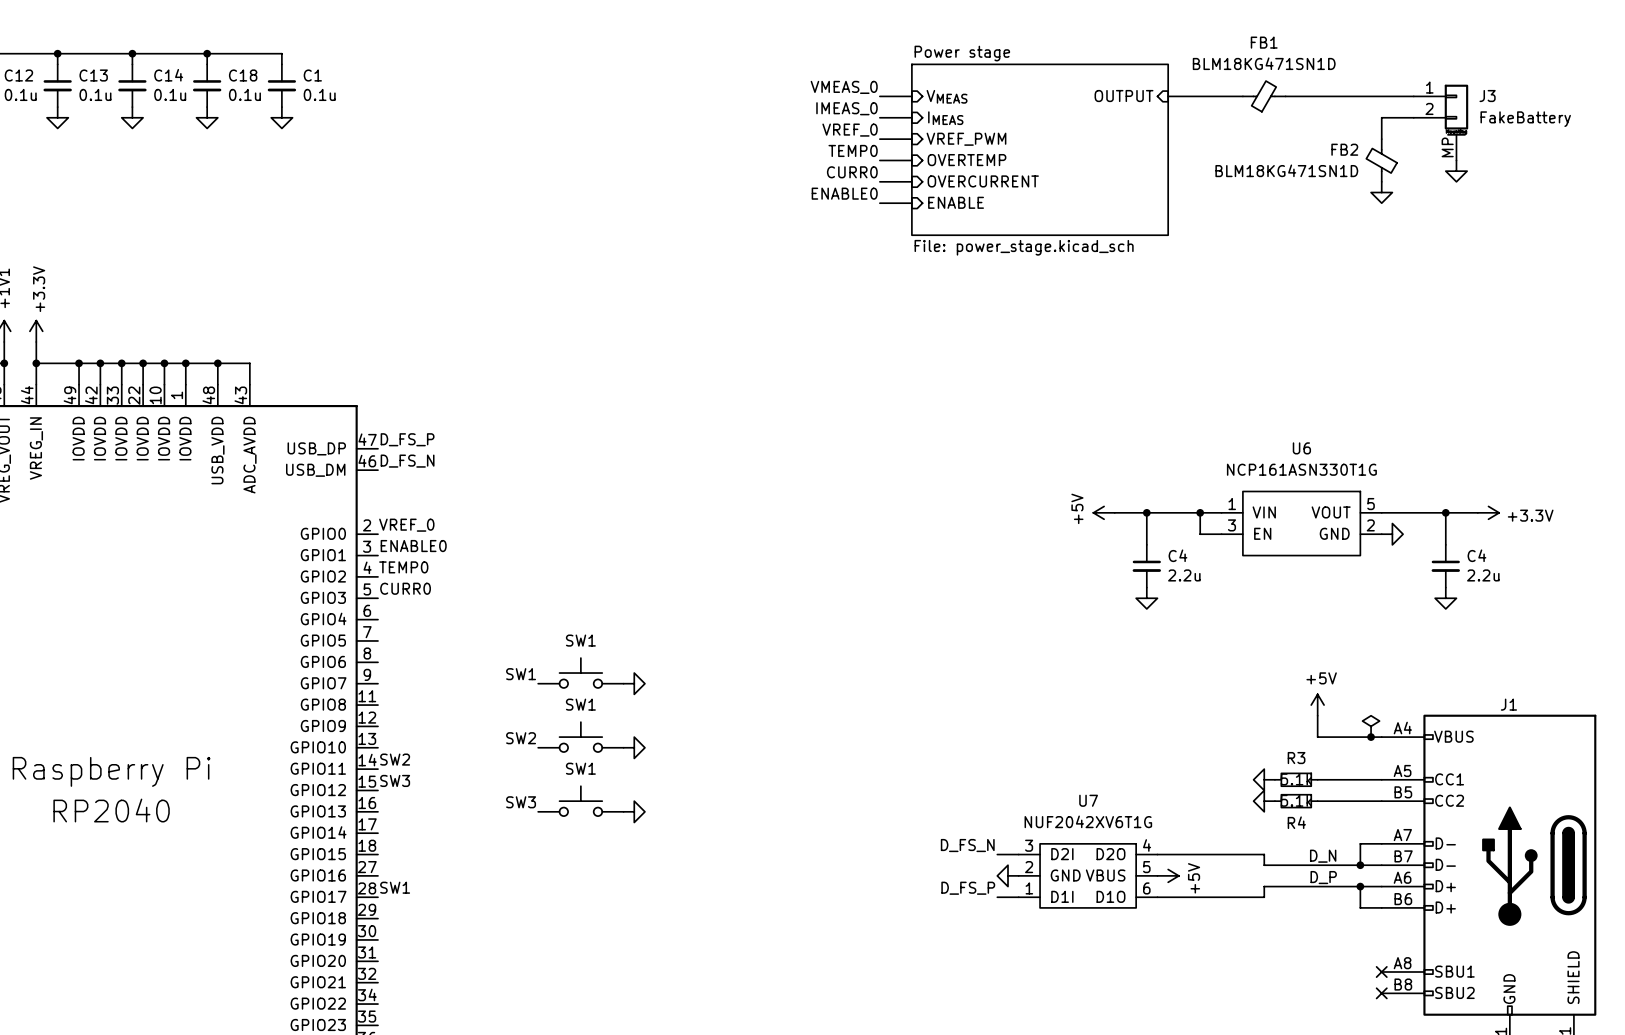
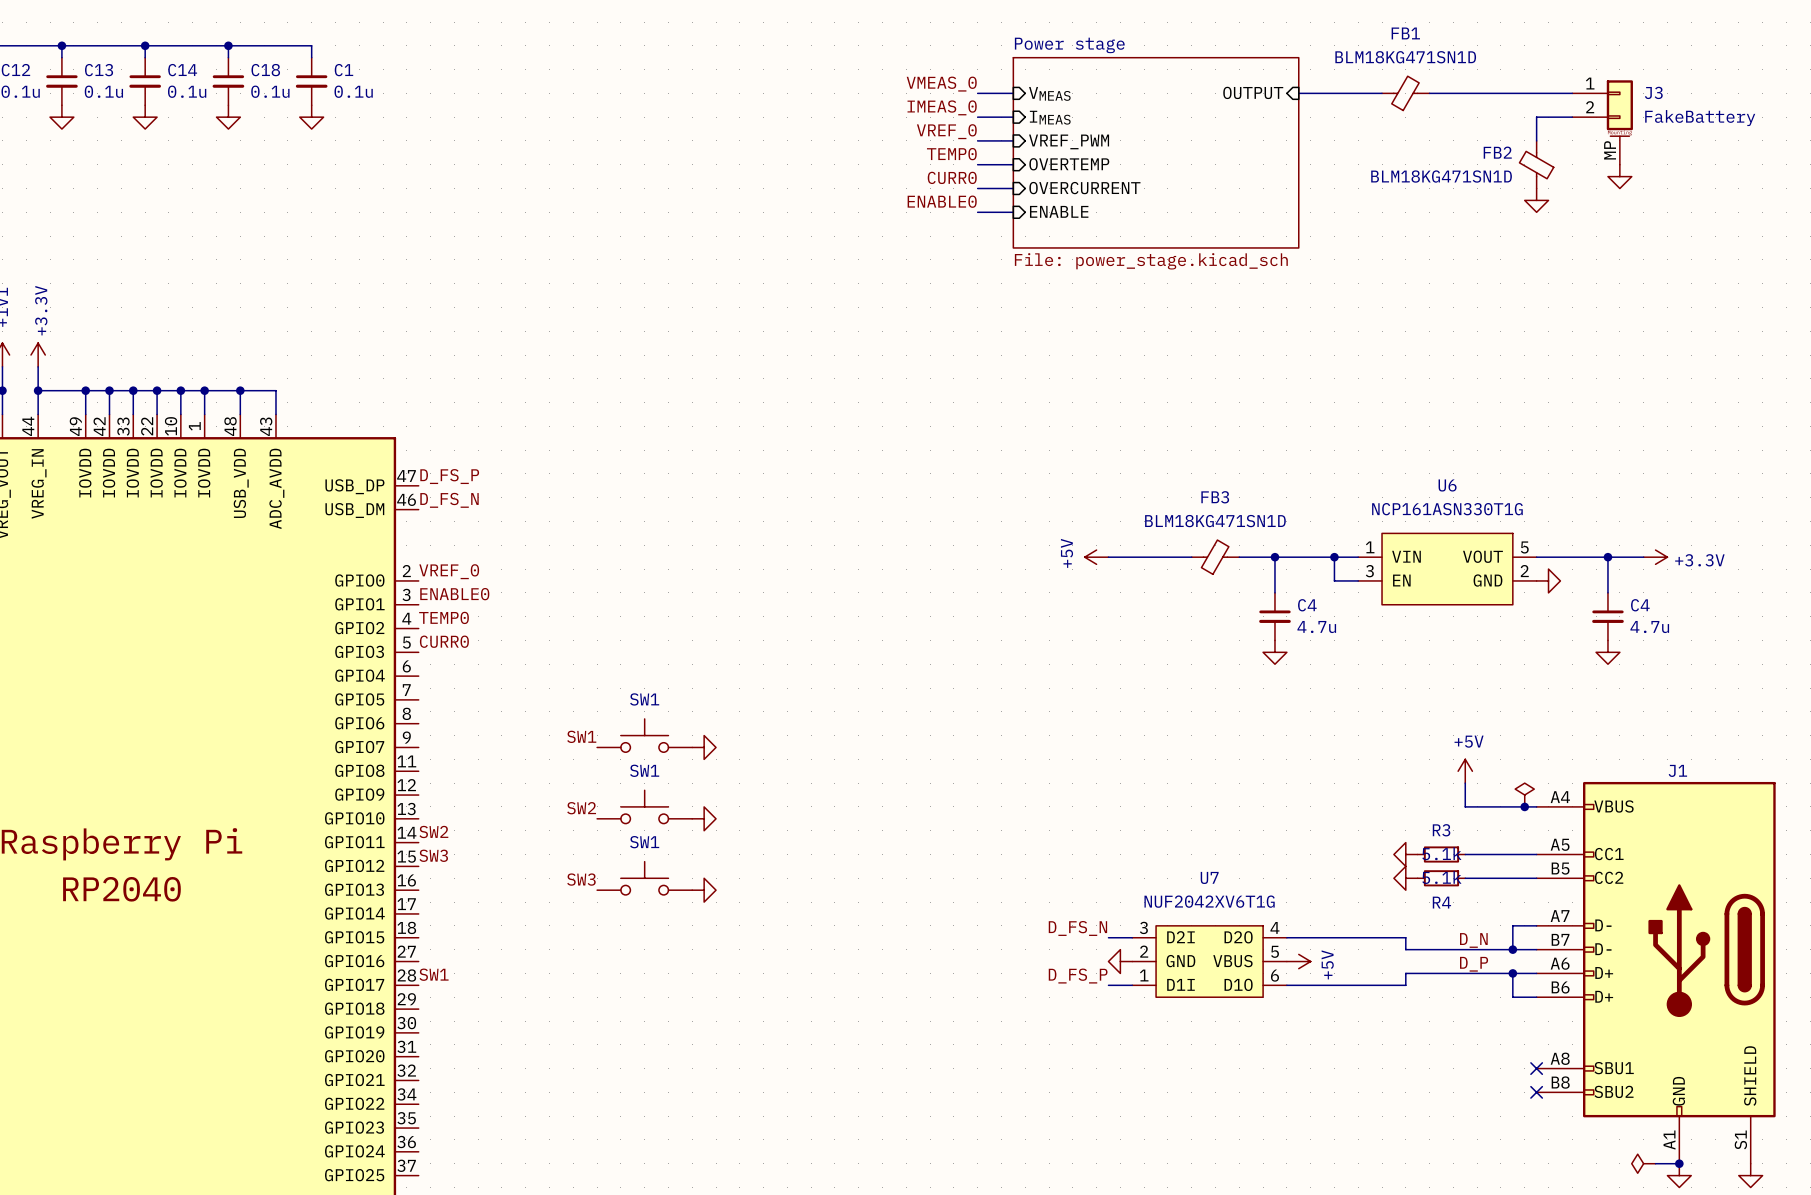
wire: none -> (1108, 557) (1191, 557)
FB3: none -> BLM18KG471SN1D (1215, 557)
power symbol position: +5V (1104, 512) -> +5V (1096, 557)
C4 value: 2.2u (1184, 575) -> 4.7u (1316, 627)
C4 value: 2.2u (1483, 575) -> 4.7u (1649, 627)

